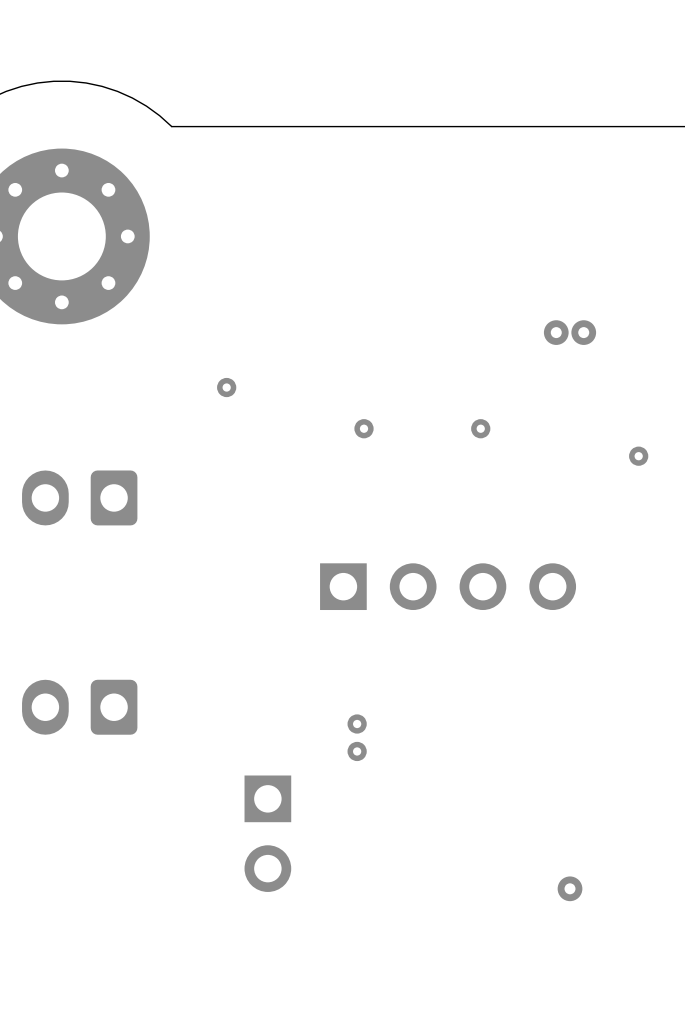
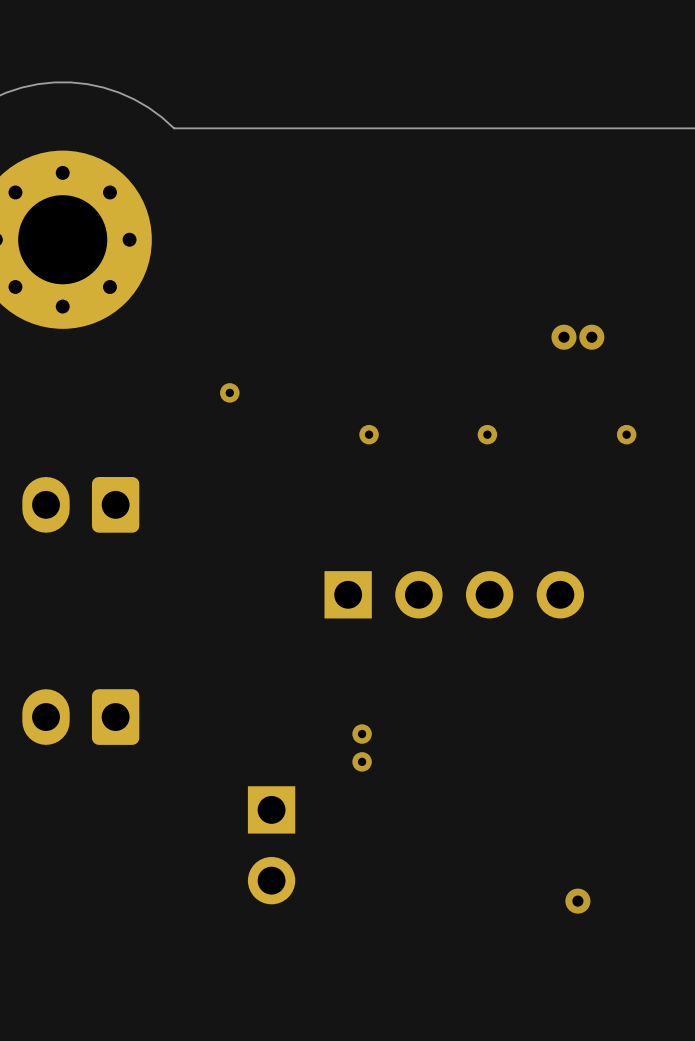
via position: (638, 456) -> (626, 434)

